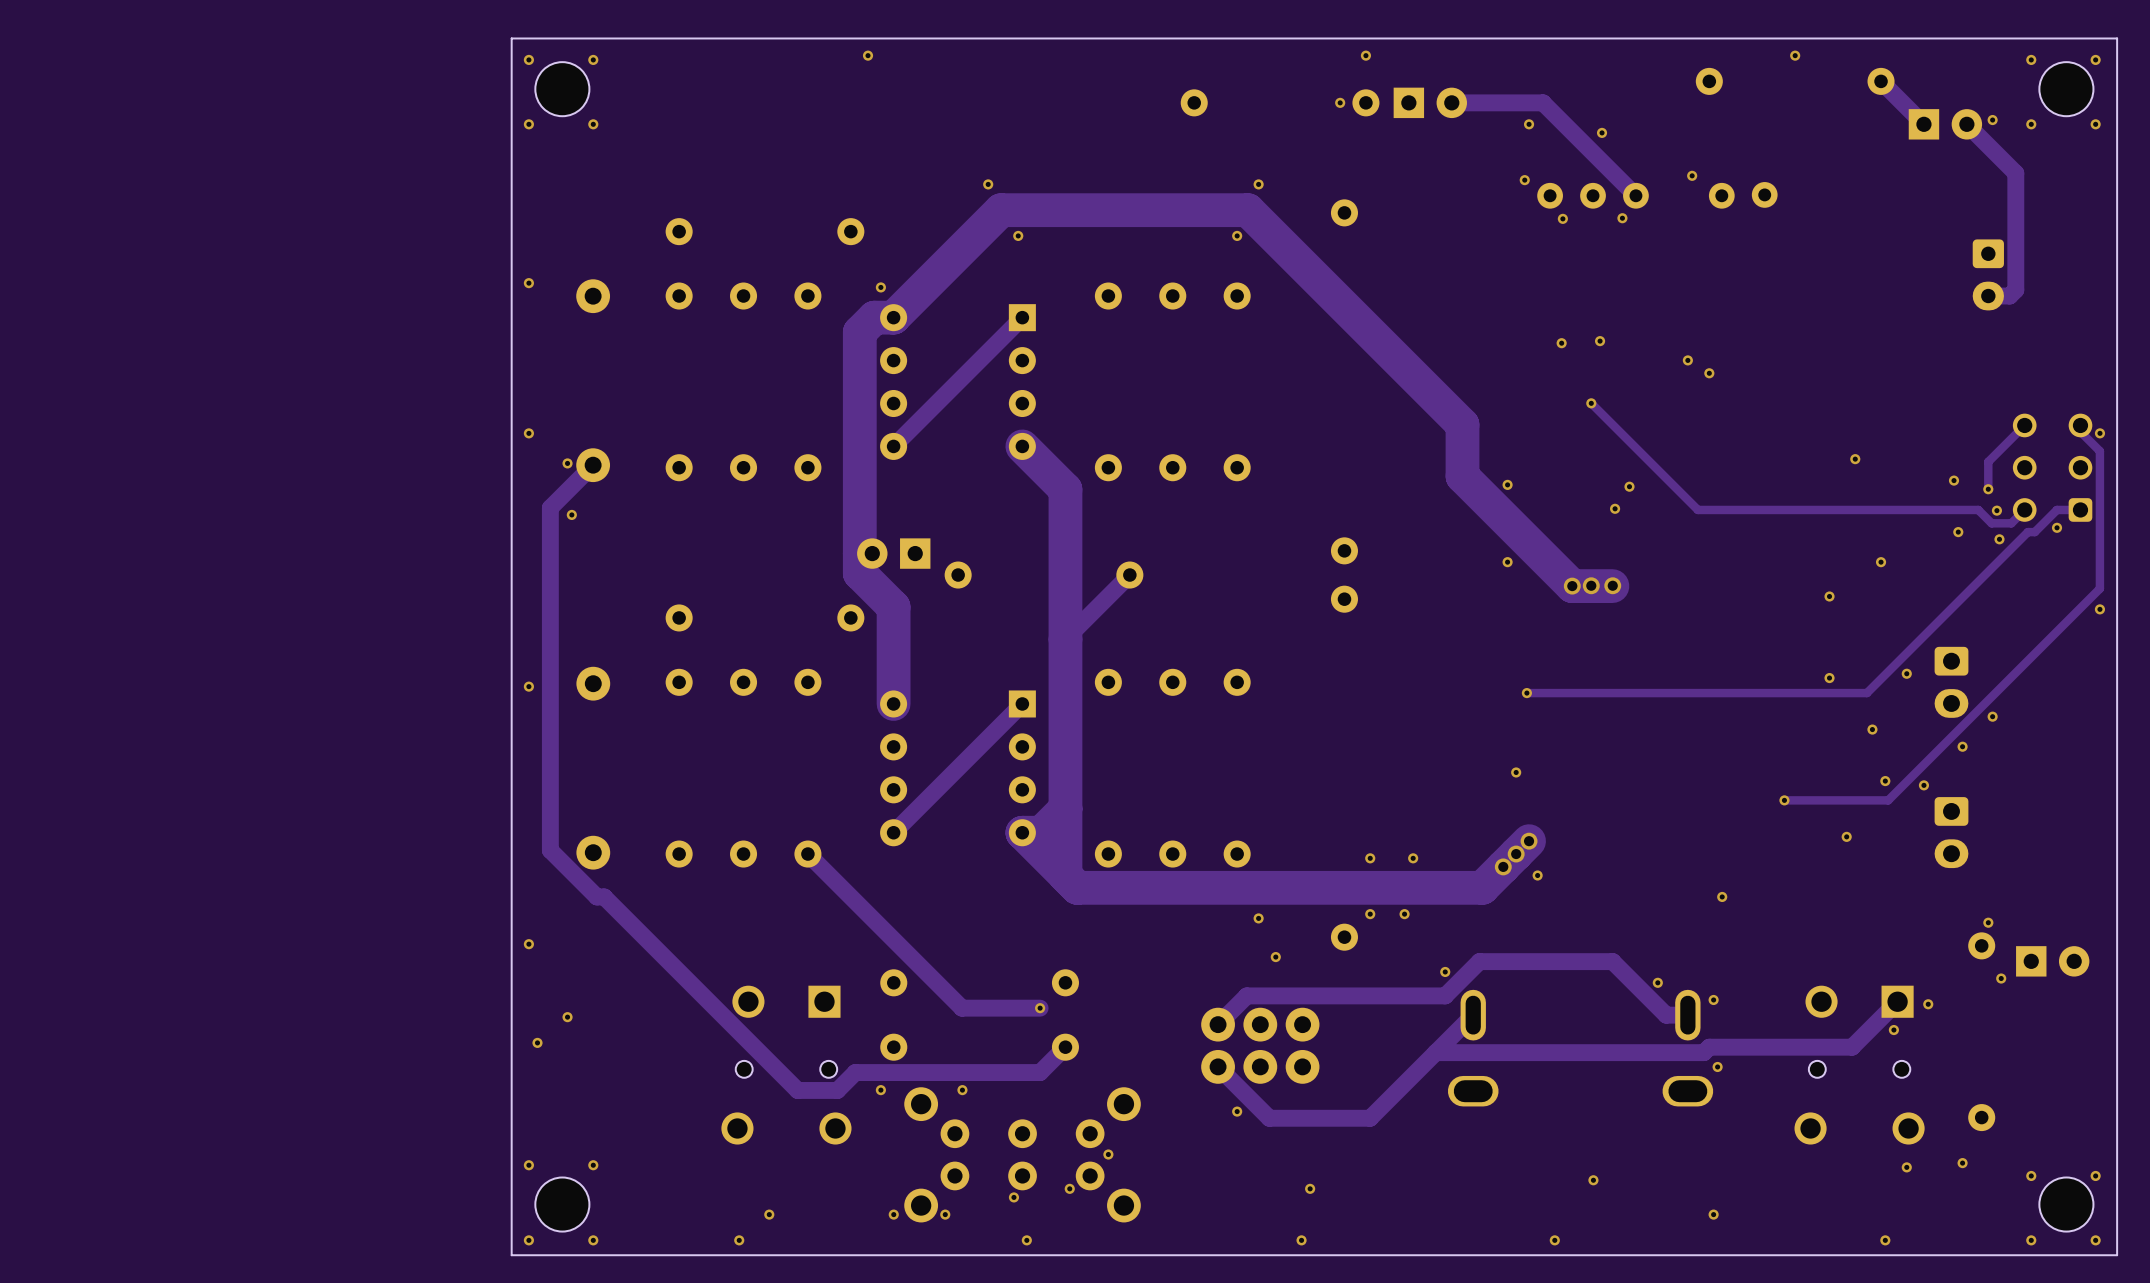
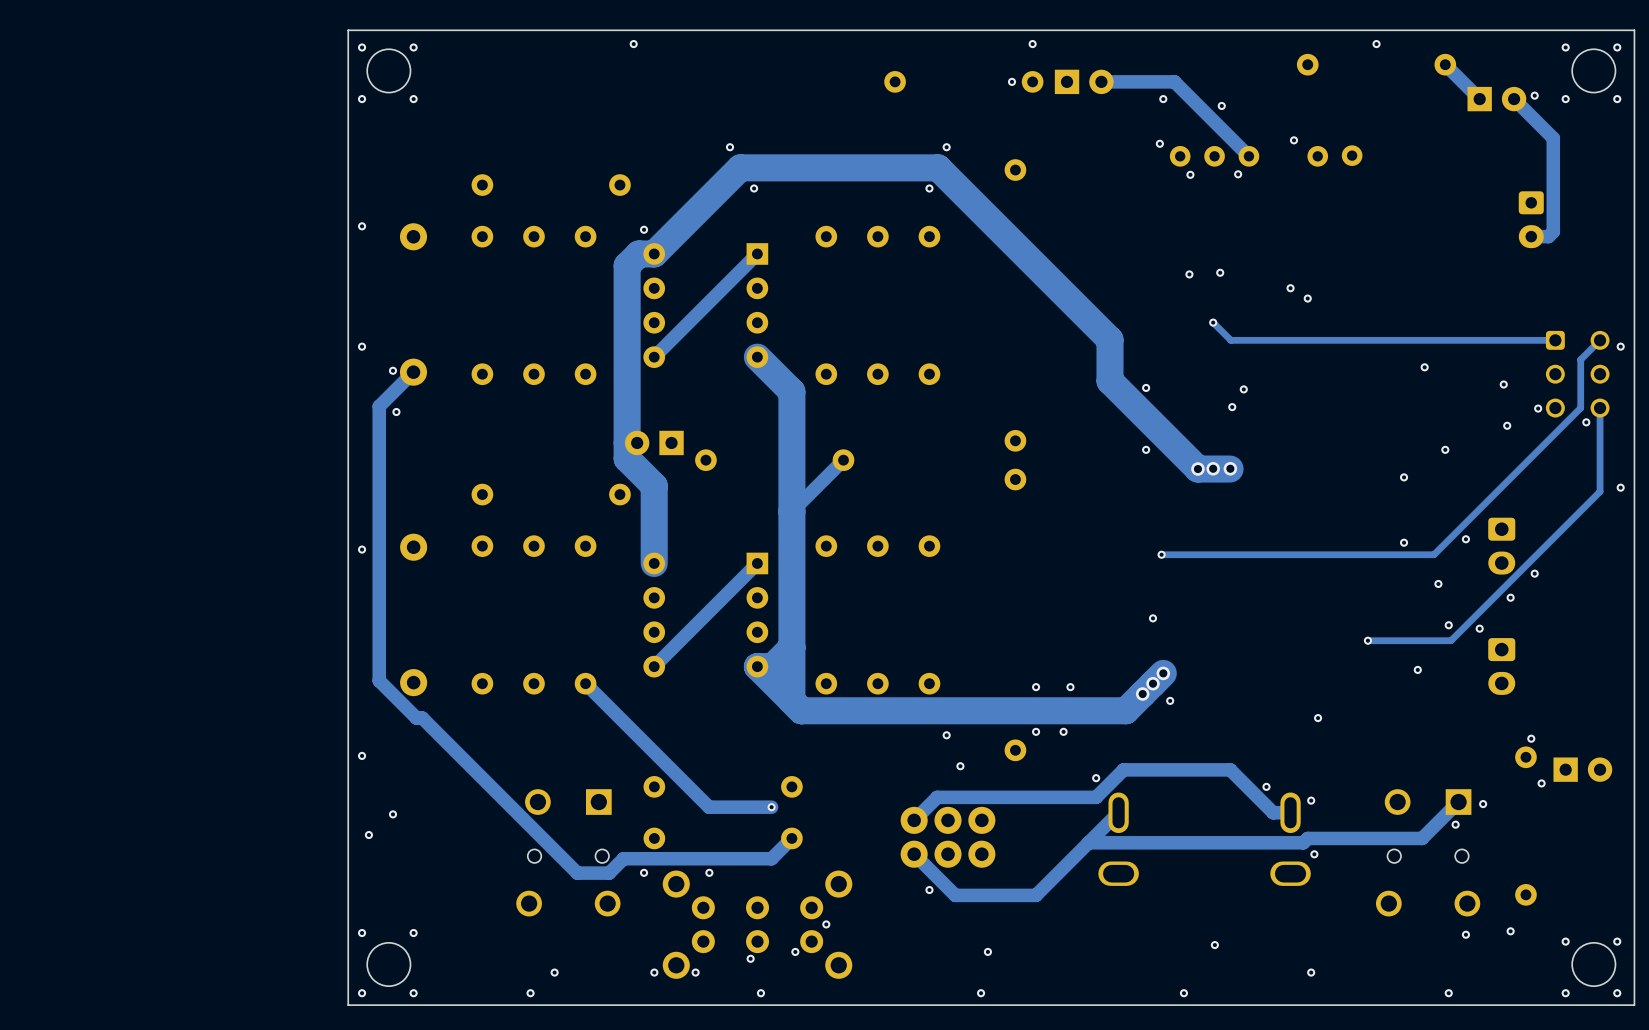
track: (1613, 425) (1697, 509) (1978, 509) (1991, 523) (2011, 523) (2024, 509) -> (1230, 340) (1555, 340)
track: (2024, 425) (1988, 461) (1988, 489) -> none
track: (2080, 425) (2080, 431) (2099, 451) (2099, 588) (2074, 614) -> (1600, 408) (1600, 491)
part rotation: 0° (2052, 467) -> 180° (1577, 374)
via: (1988, 489) -> none
track: (2080, 509) (2056, 509) (2034, 532) (2027, 532) -> (1600, 340) (1580, 359) (1580, 408) (1562, 425)
via: (1999, 539) -> none

